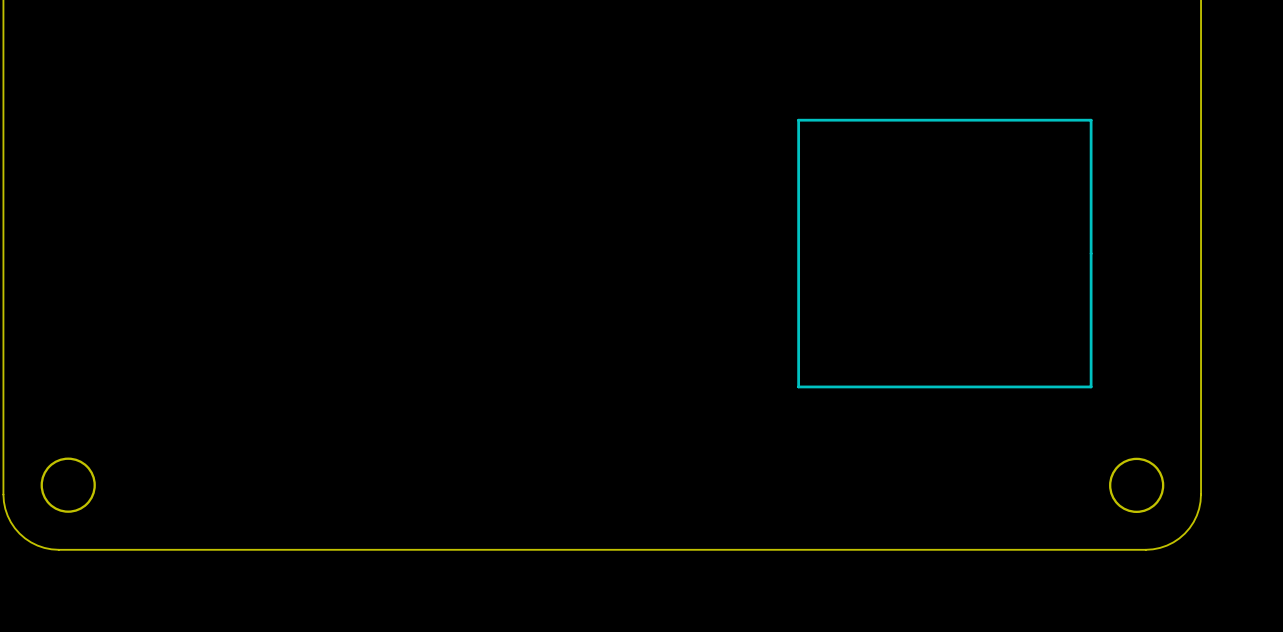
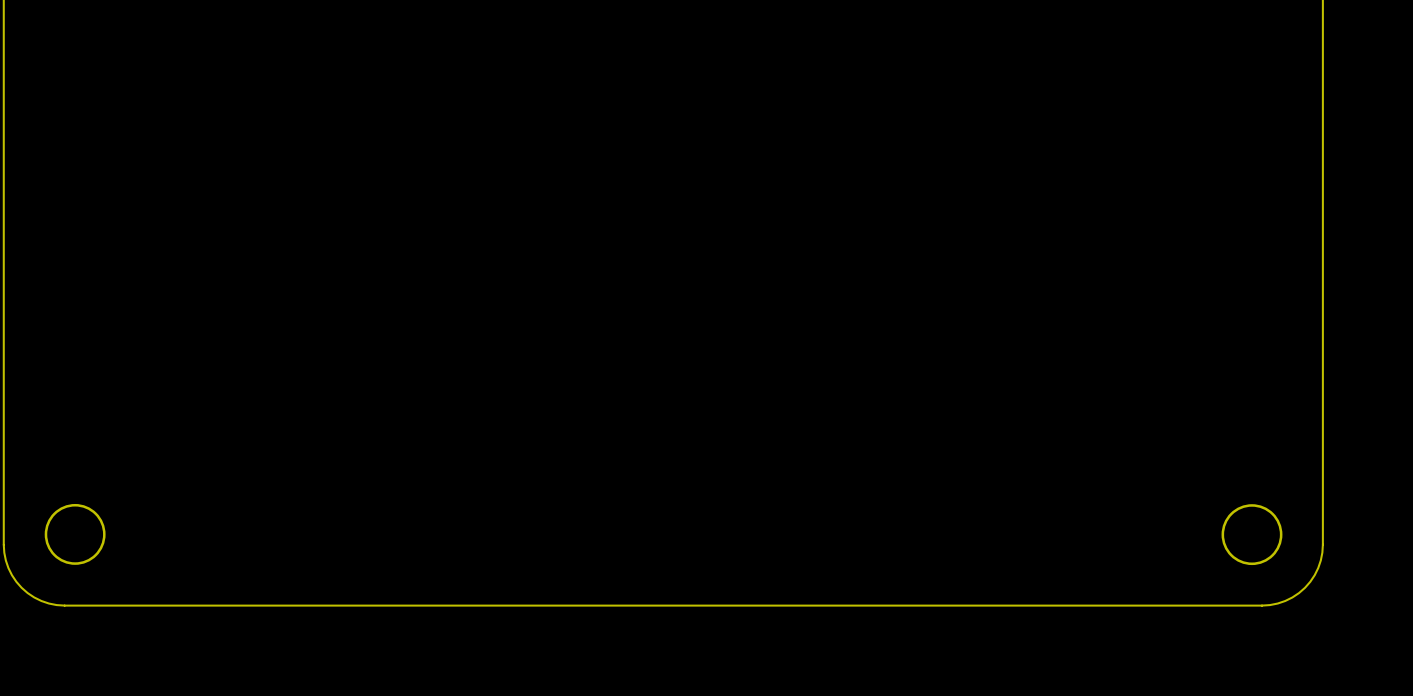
part: (944, 253) -> none

